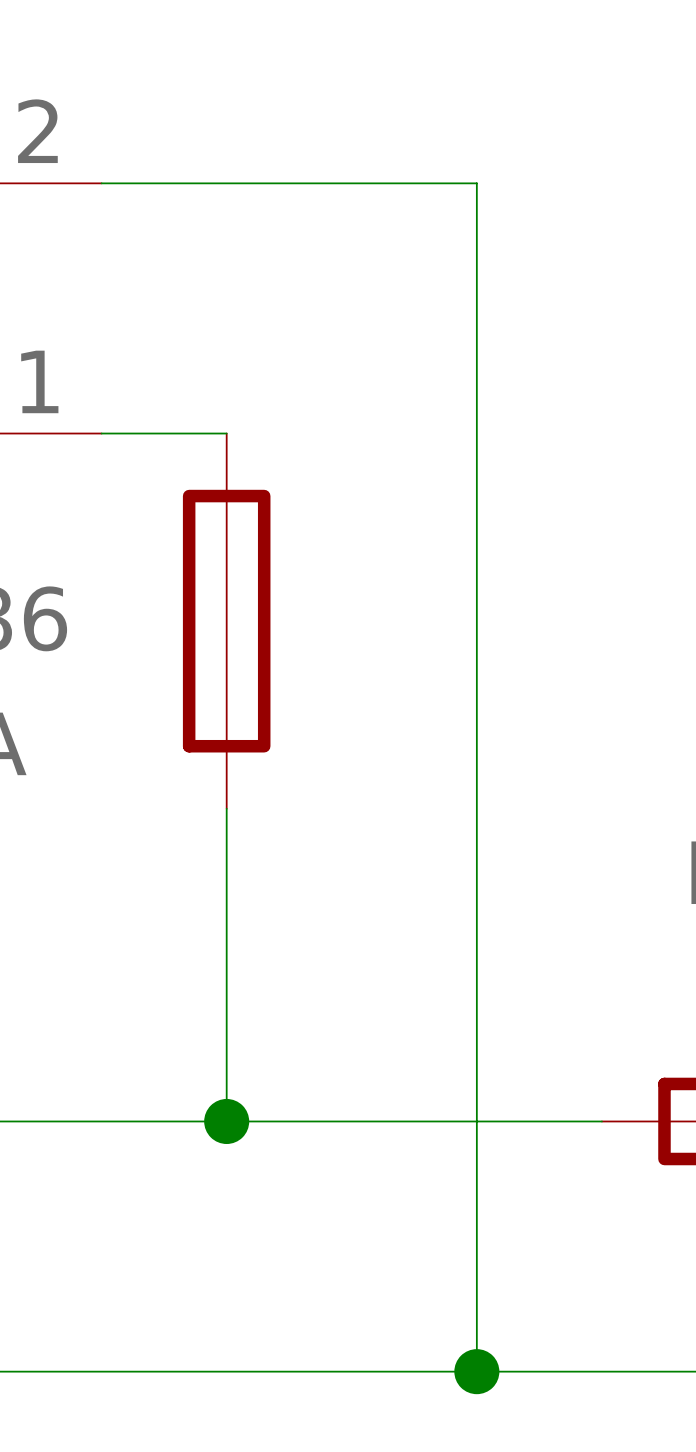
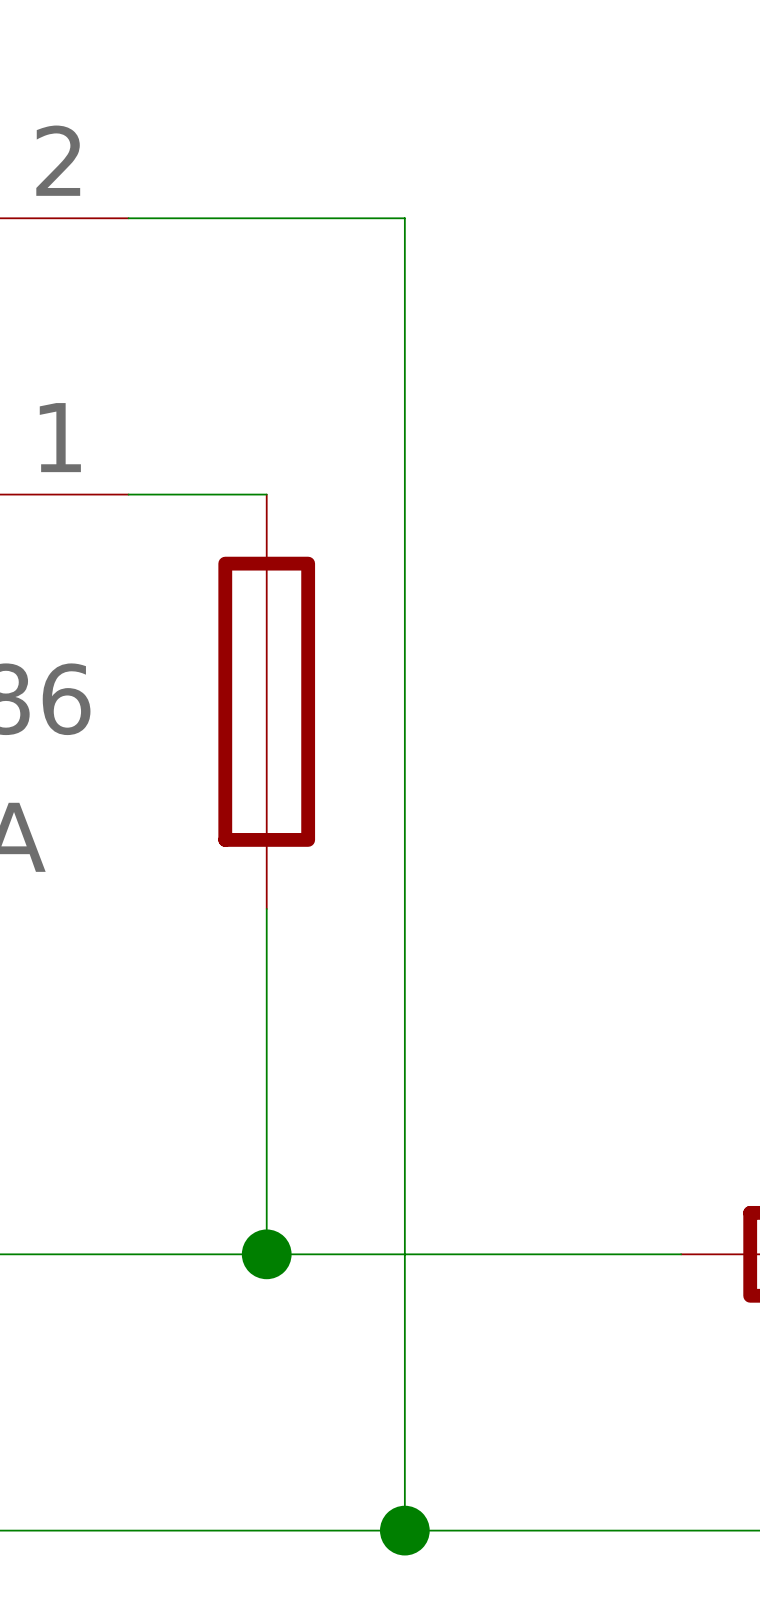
wire: (351, 183) (476, 183) (476, 1371) -> (404, 218) (404, 1530)
junction position: (476, 1371) -> (404, 1530)

